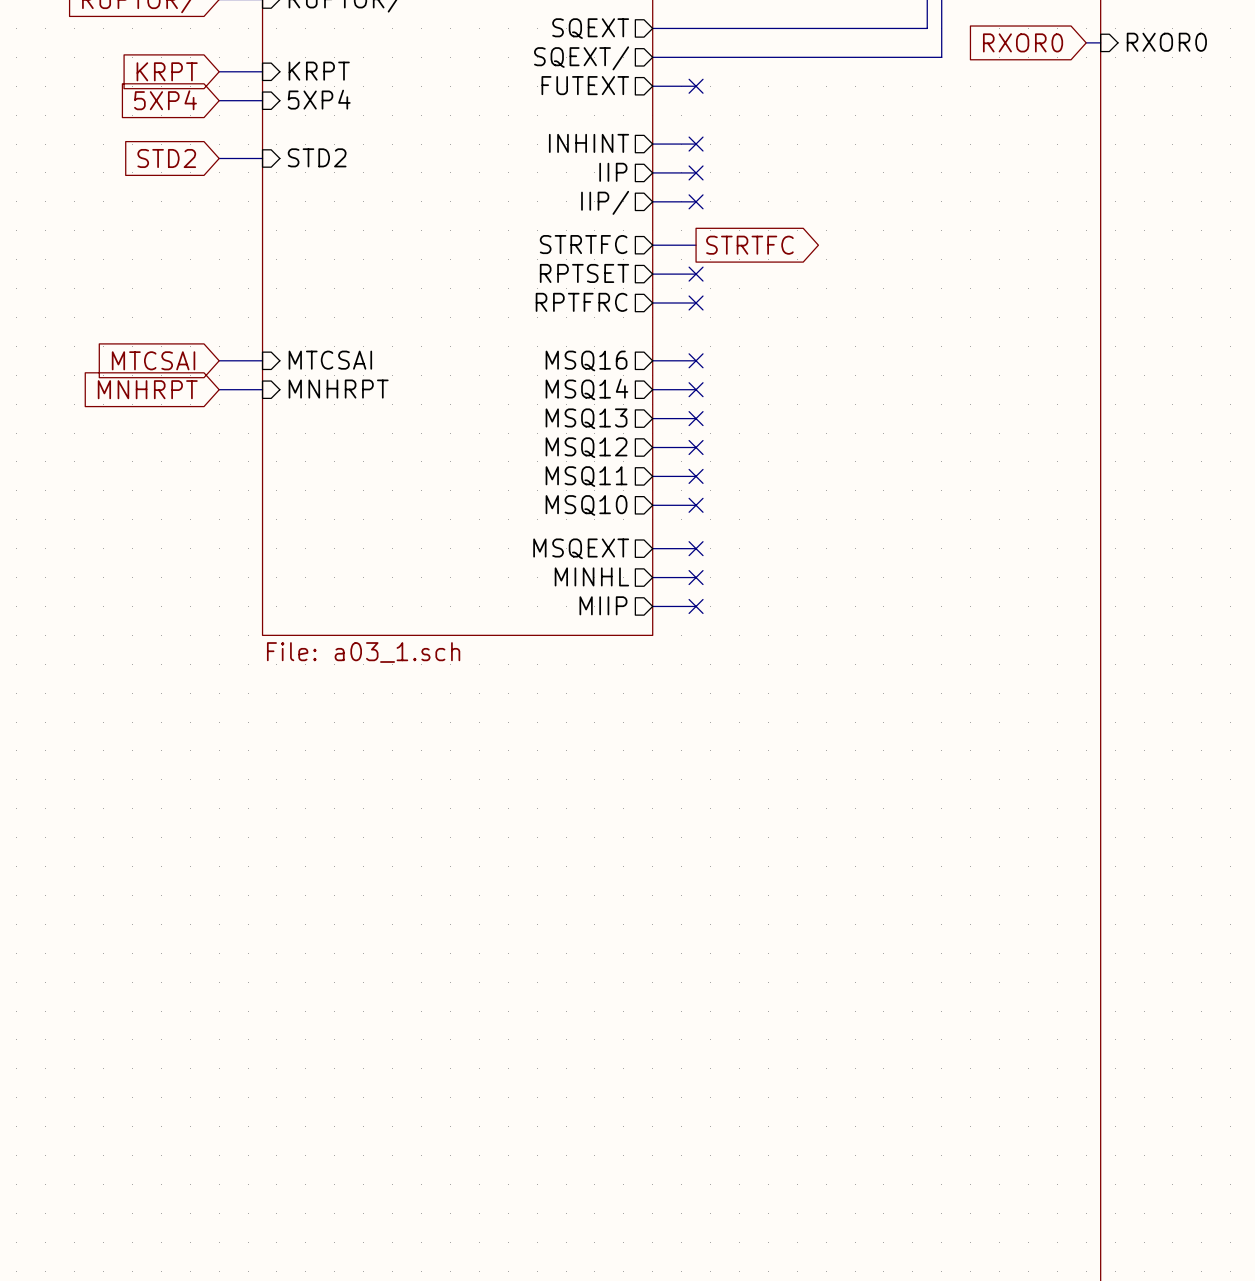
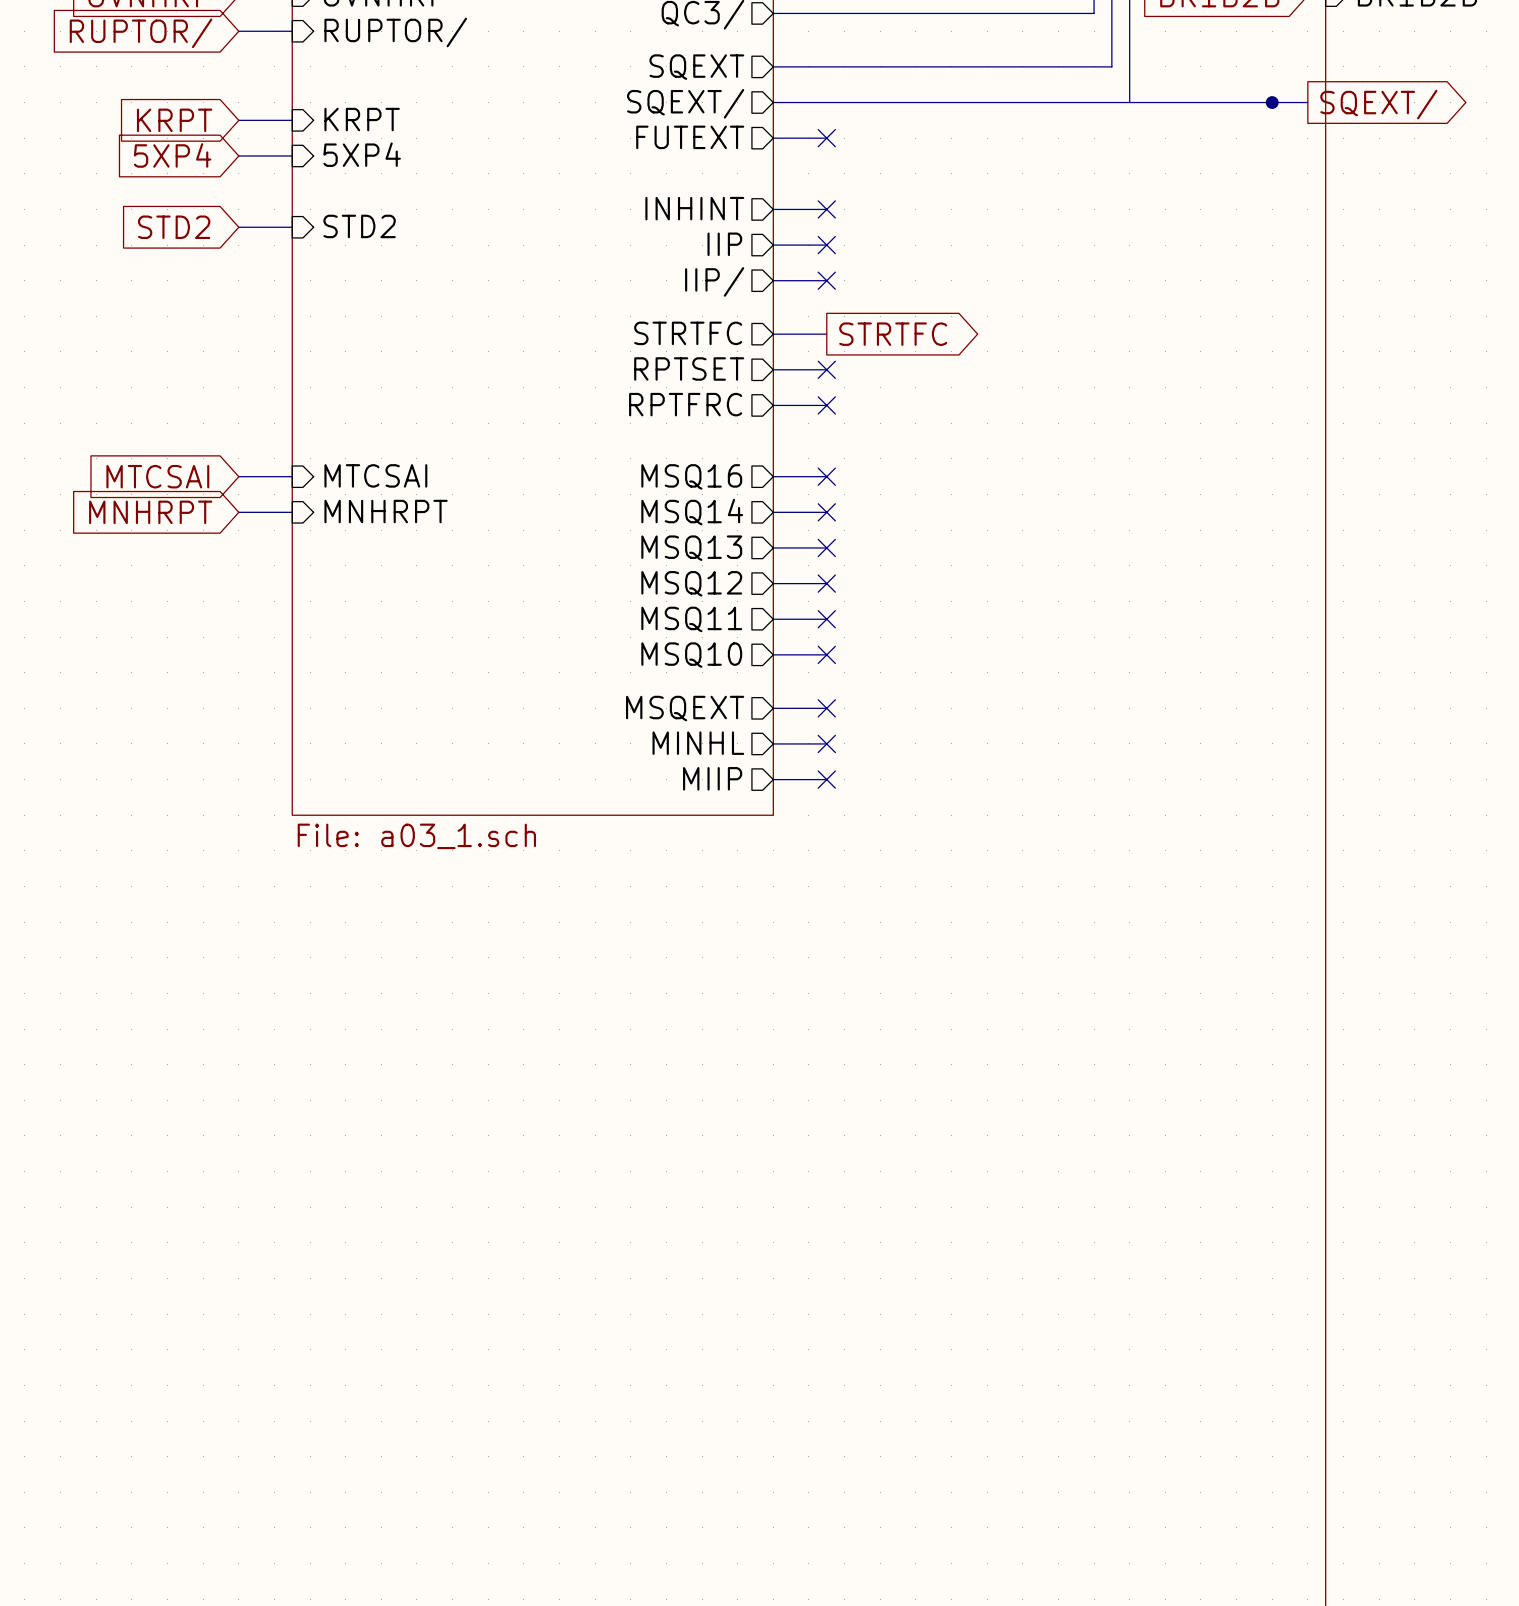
global label: RXOR0 (1023, 42) -> none
wire: (1086, 42) (1100, 42) -> none
sheet pin: RXOR0 (1166, 42) -> none
wire: none -> (1129, 102) (1307, 102)
junction: none -> (1272, 102)
global label: none -> SQEXT/ (1378, 104)

